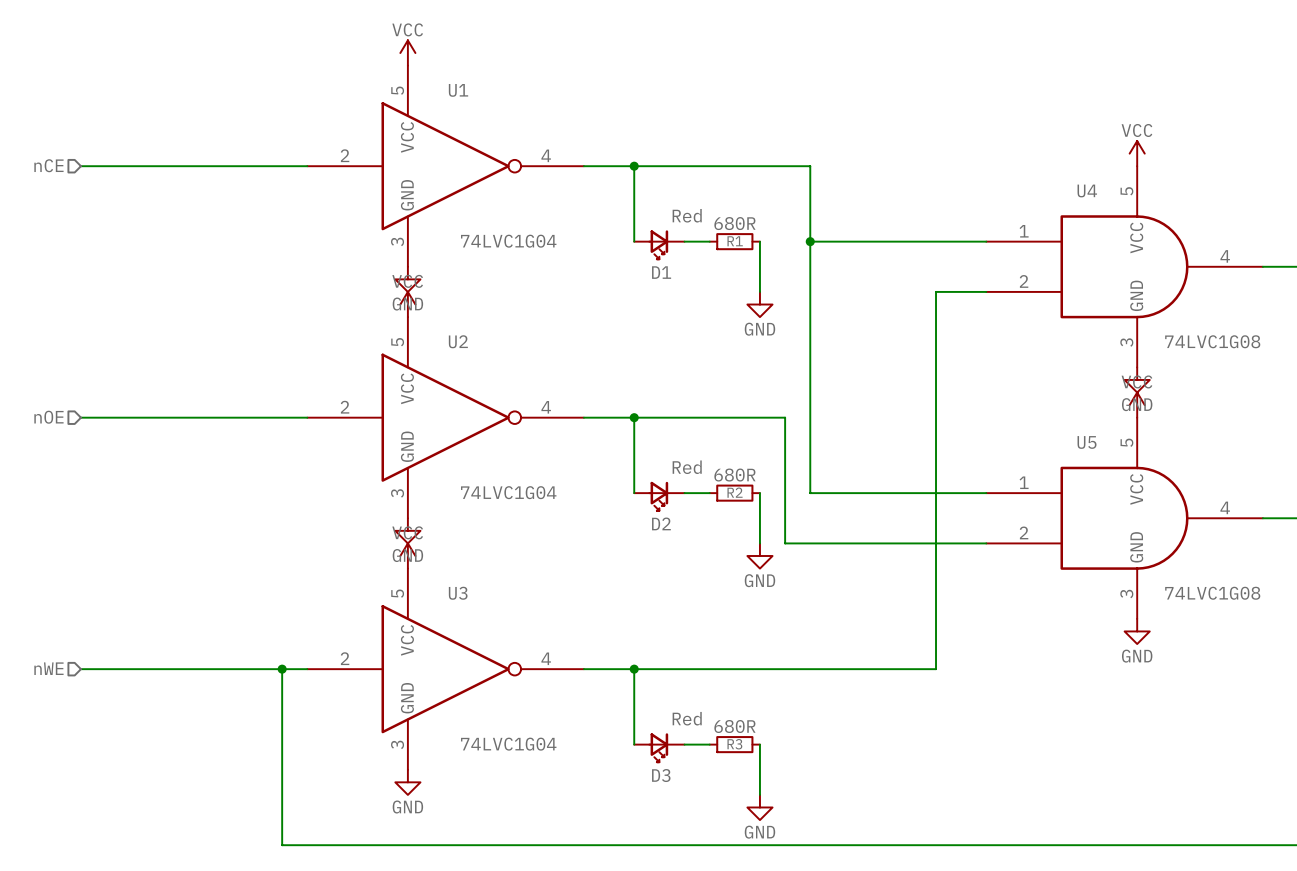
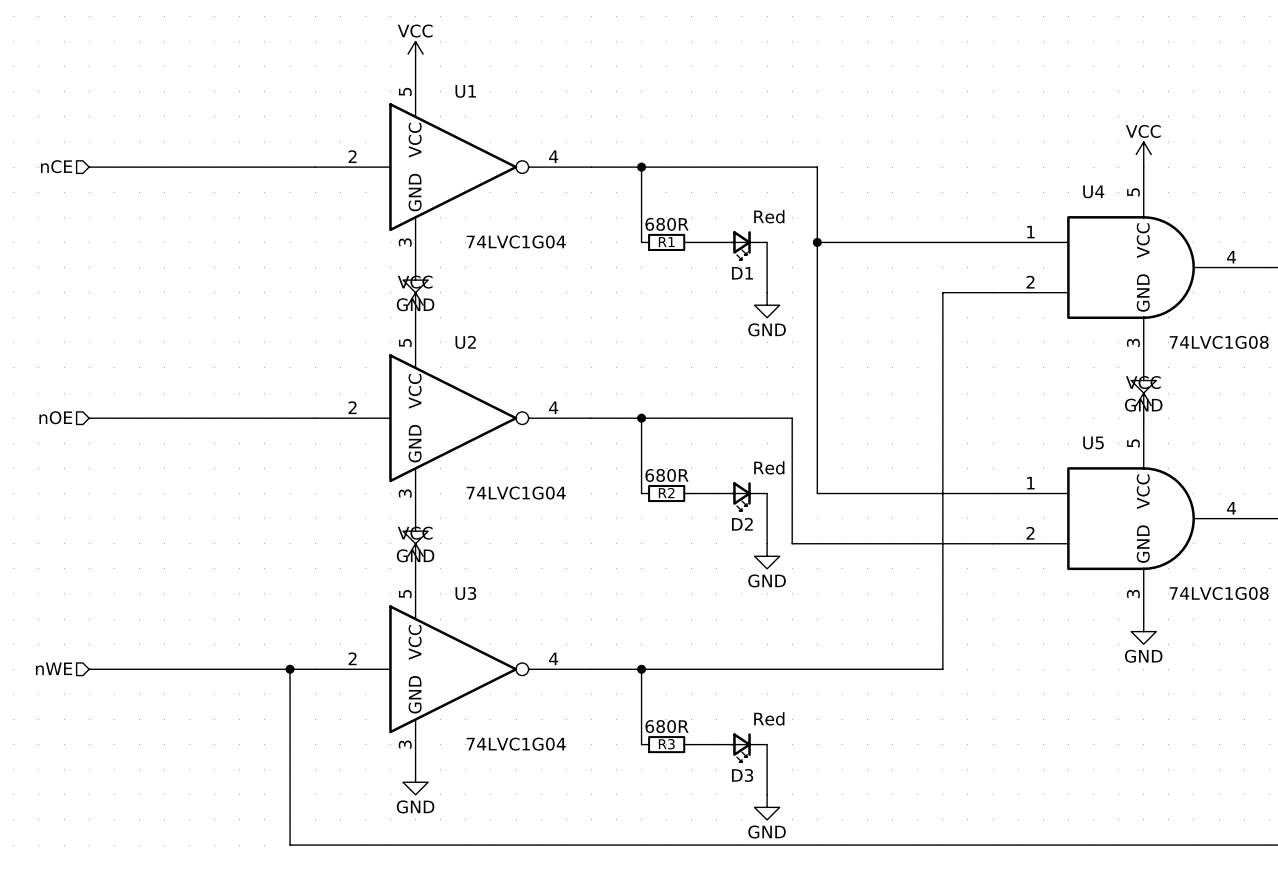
R1 position: (734, 241) -> (666, 242)
D1 position: (659, 244) -> (741, 245)
R2 position: (734, 493) -> (666, 493)
D2 position: (659, 496) -> (741, 496)
R3 position: (734, 744) -> (666, 744)
D3 position: (659, 747) -> (741, 747)

